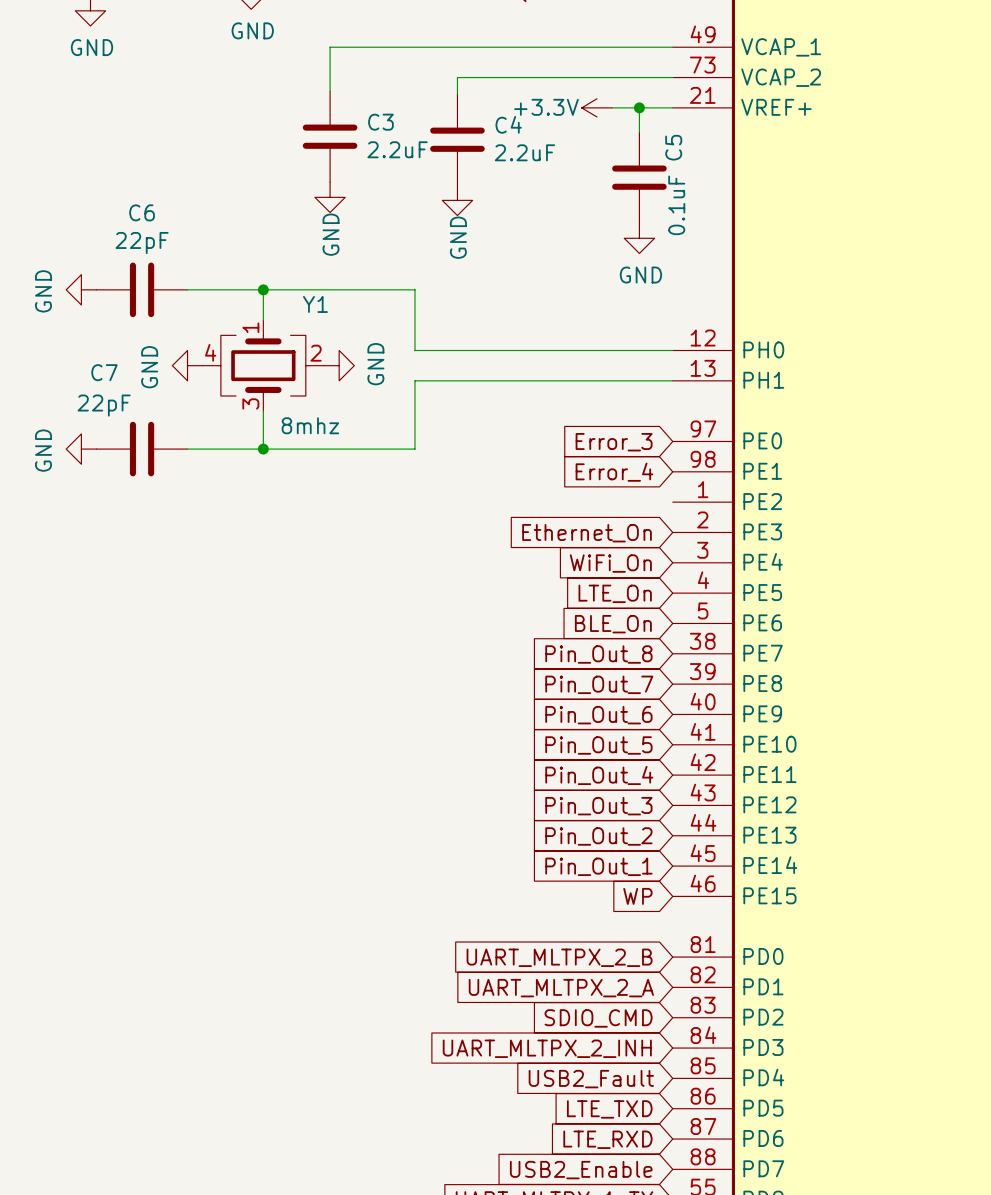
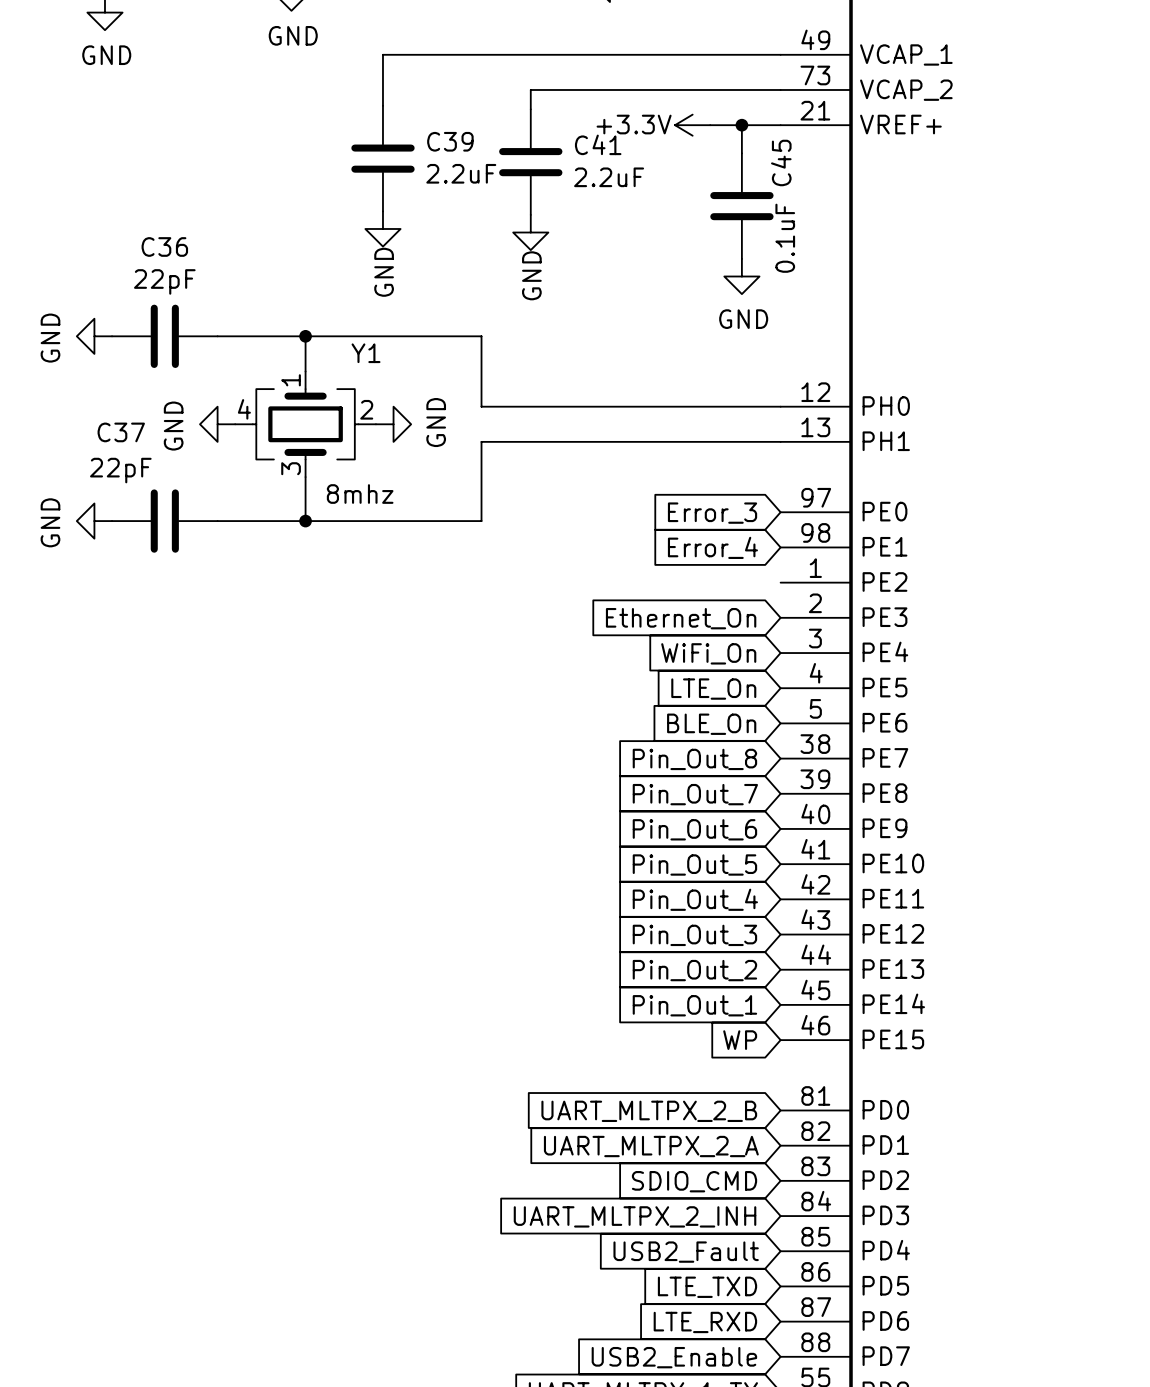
C3 name: C3 (380, 122) -> C39 (450, 141)
C4 name: C4 (508, 124) -> C41 (598, 144)
C5 name: C5 (673, 147) -> C45 (781, 162)
C6 name: C6 (142, 212) -> C36 (164, 246)
C7 name: C7 (104, 372) -> C37 (121, 432)

